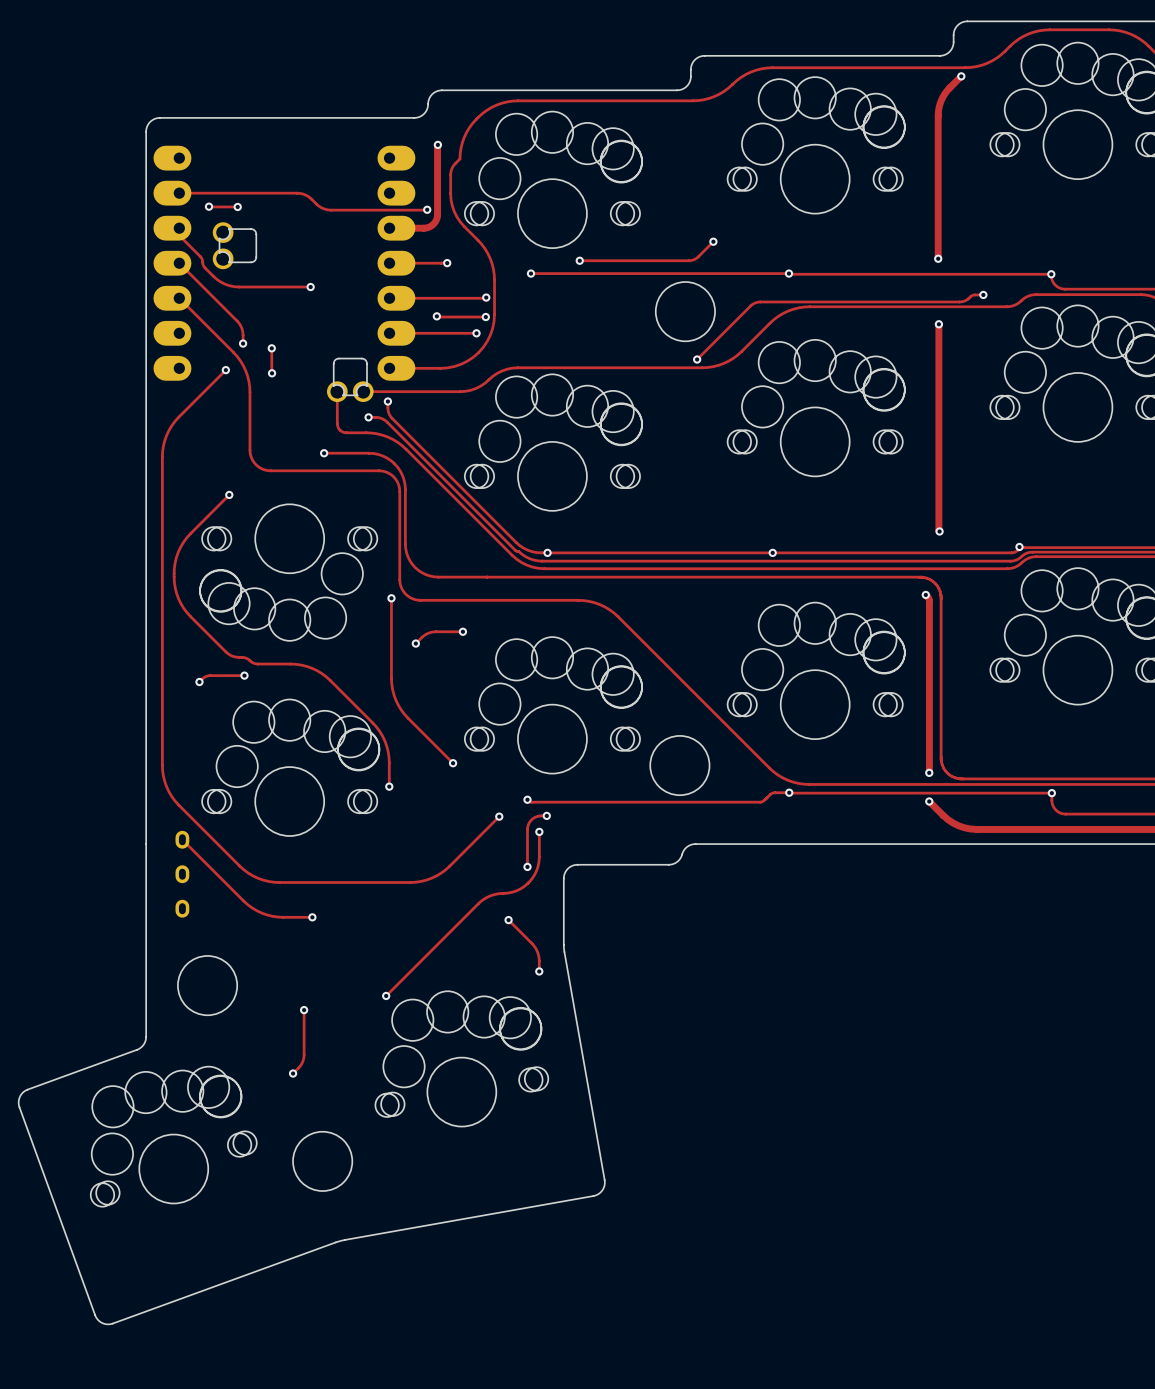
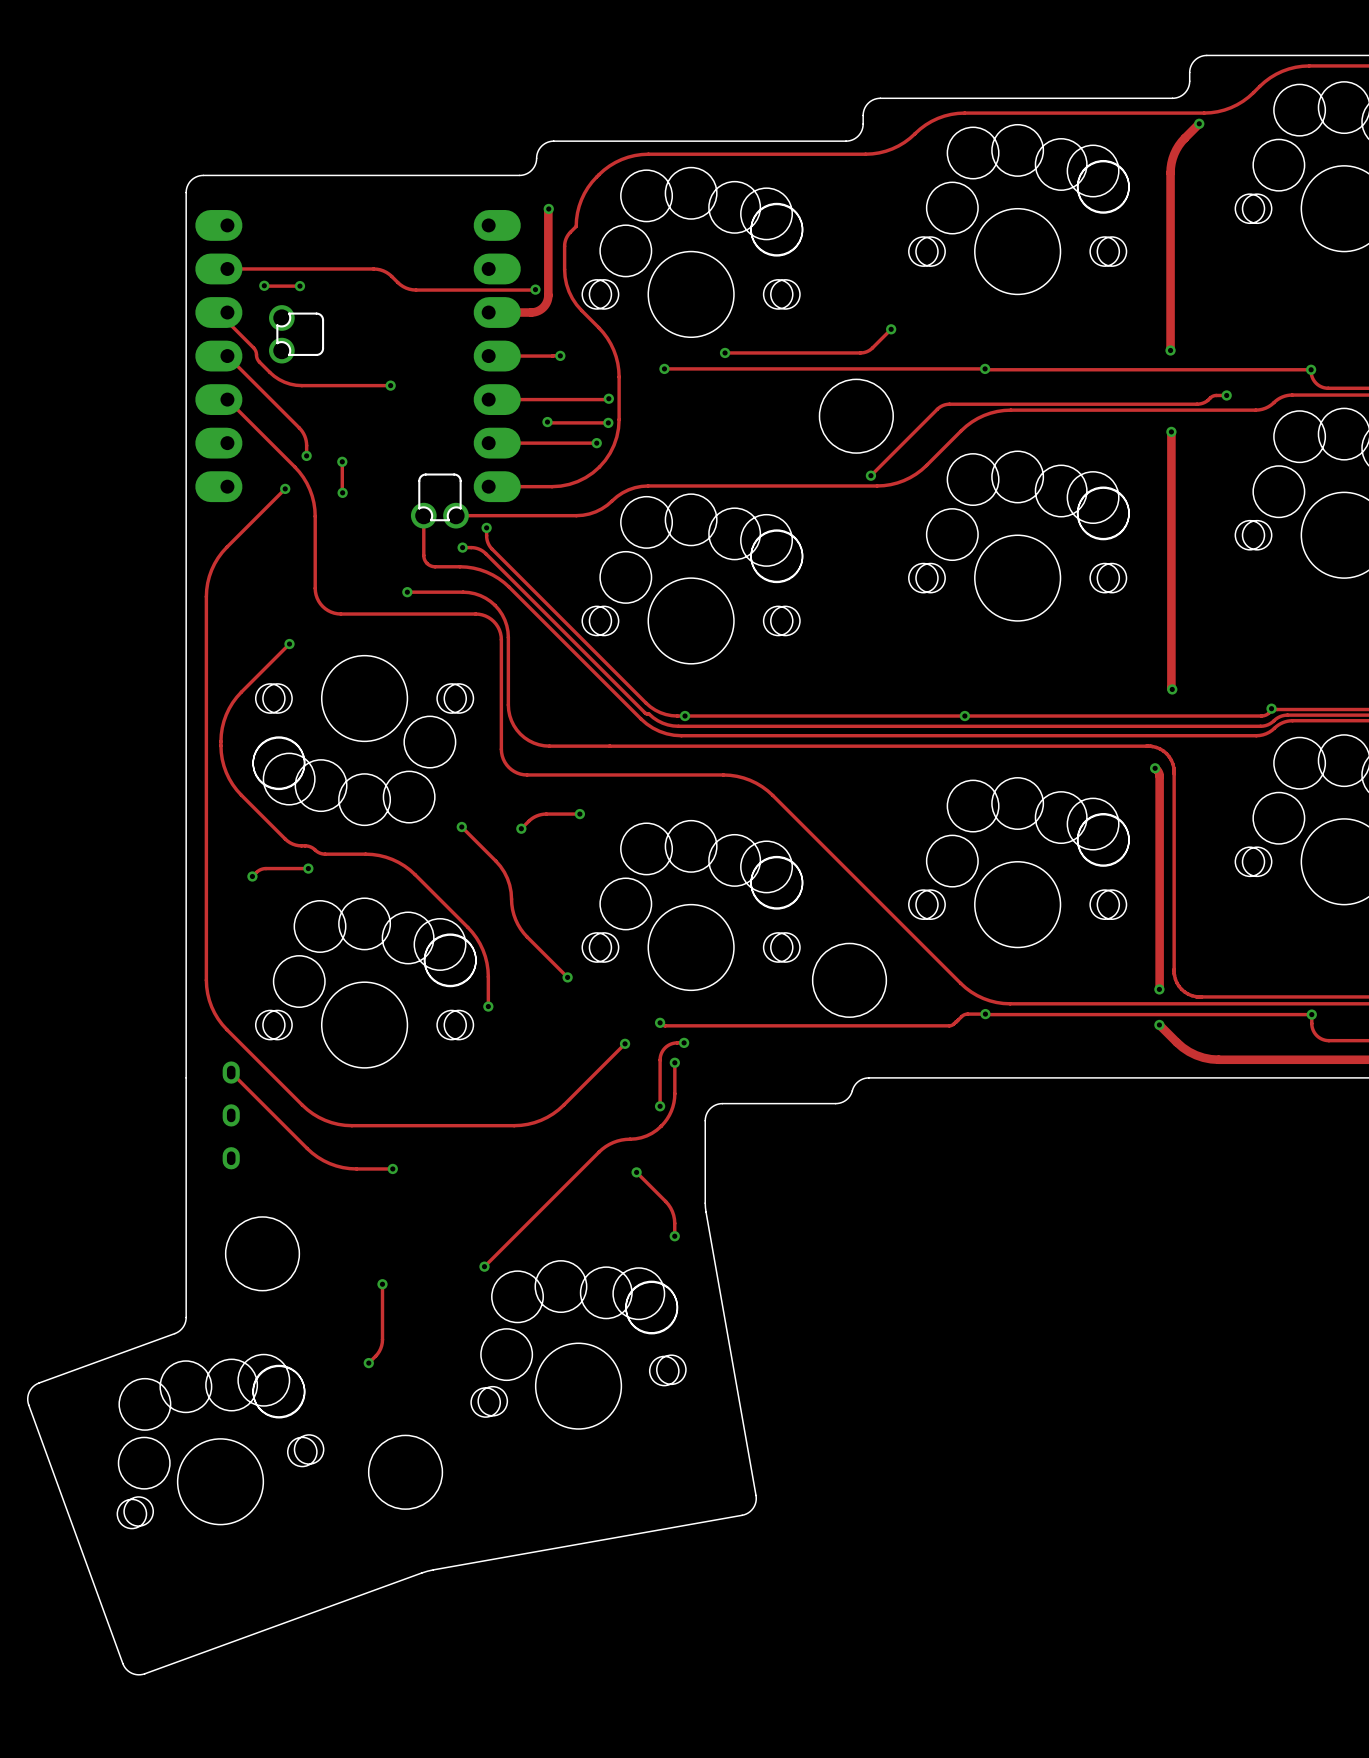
track: (391, 598) (392, 689) (400, 709) (420, 730) -> (461, 827) (504, 872) (509, 885) (513, 914) (520, 928) (527, 937)
via position: (391, 598) -> (461, 827)

